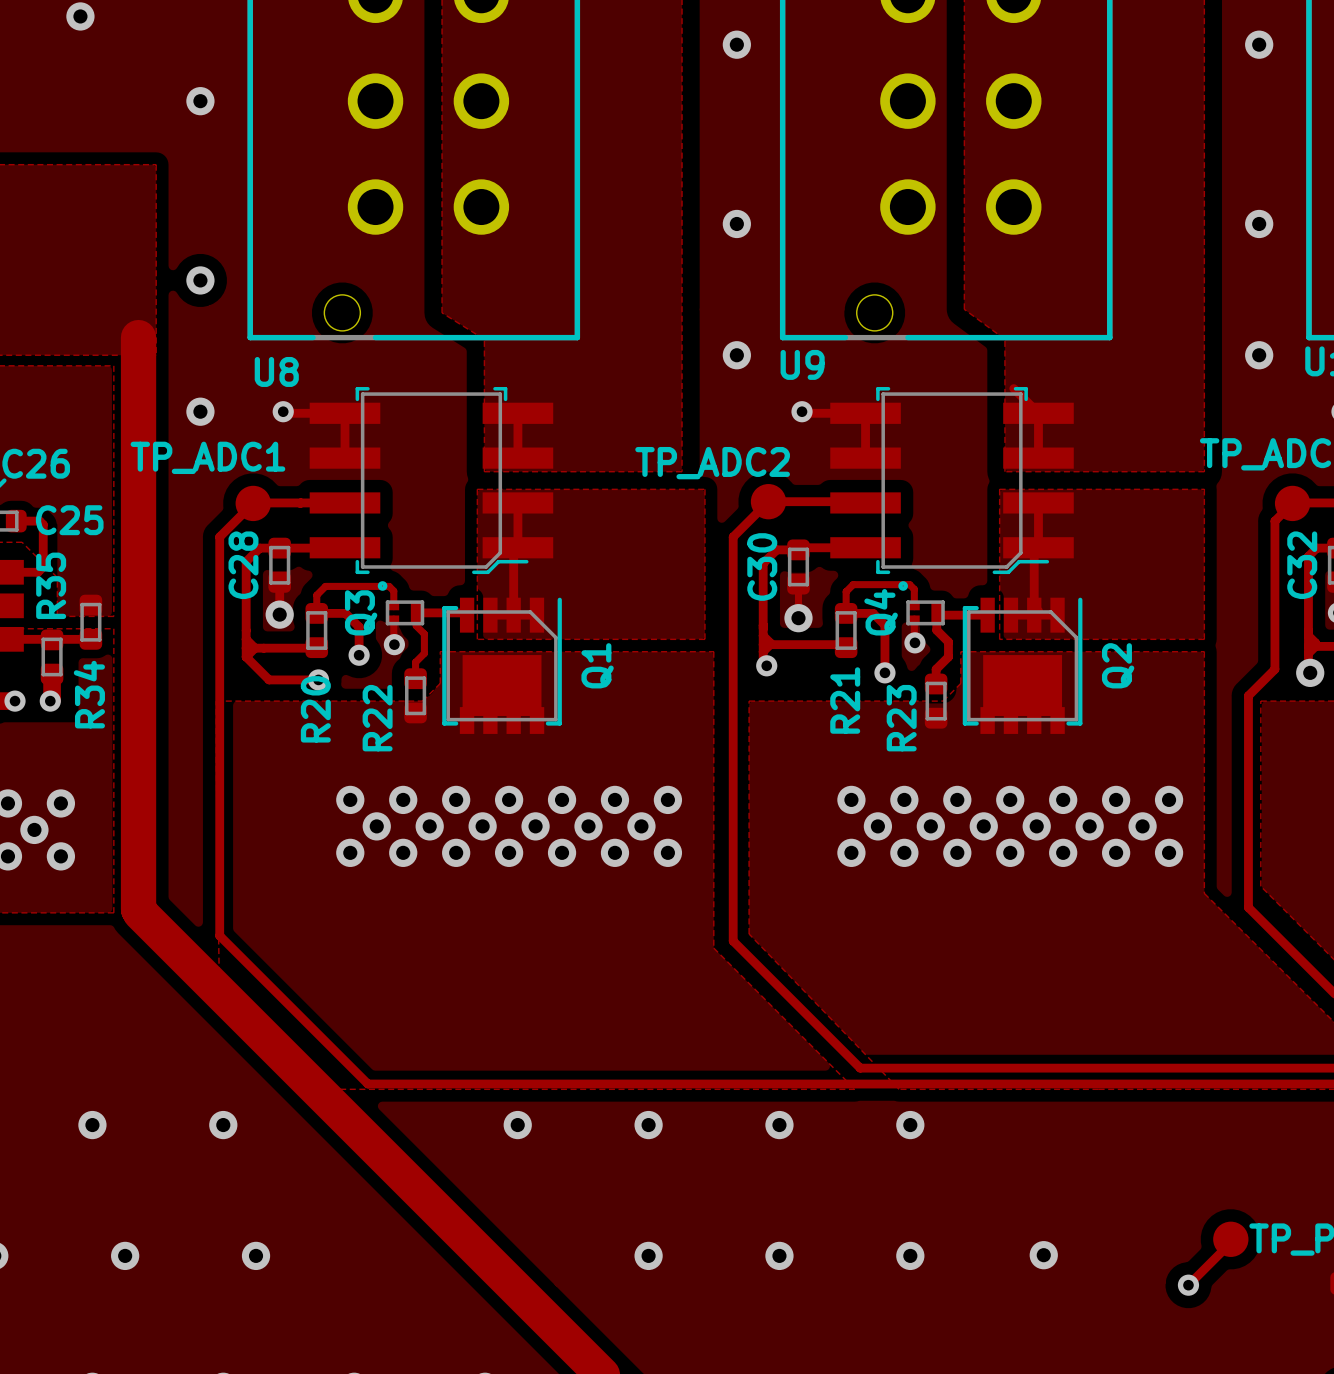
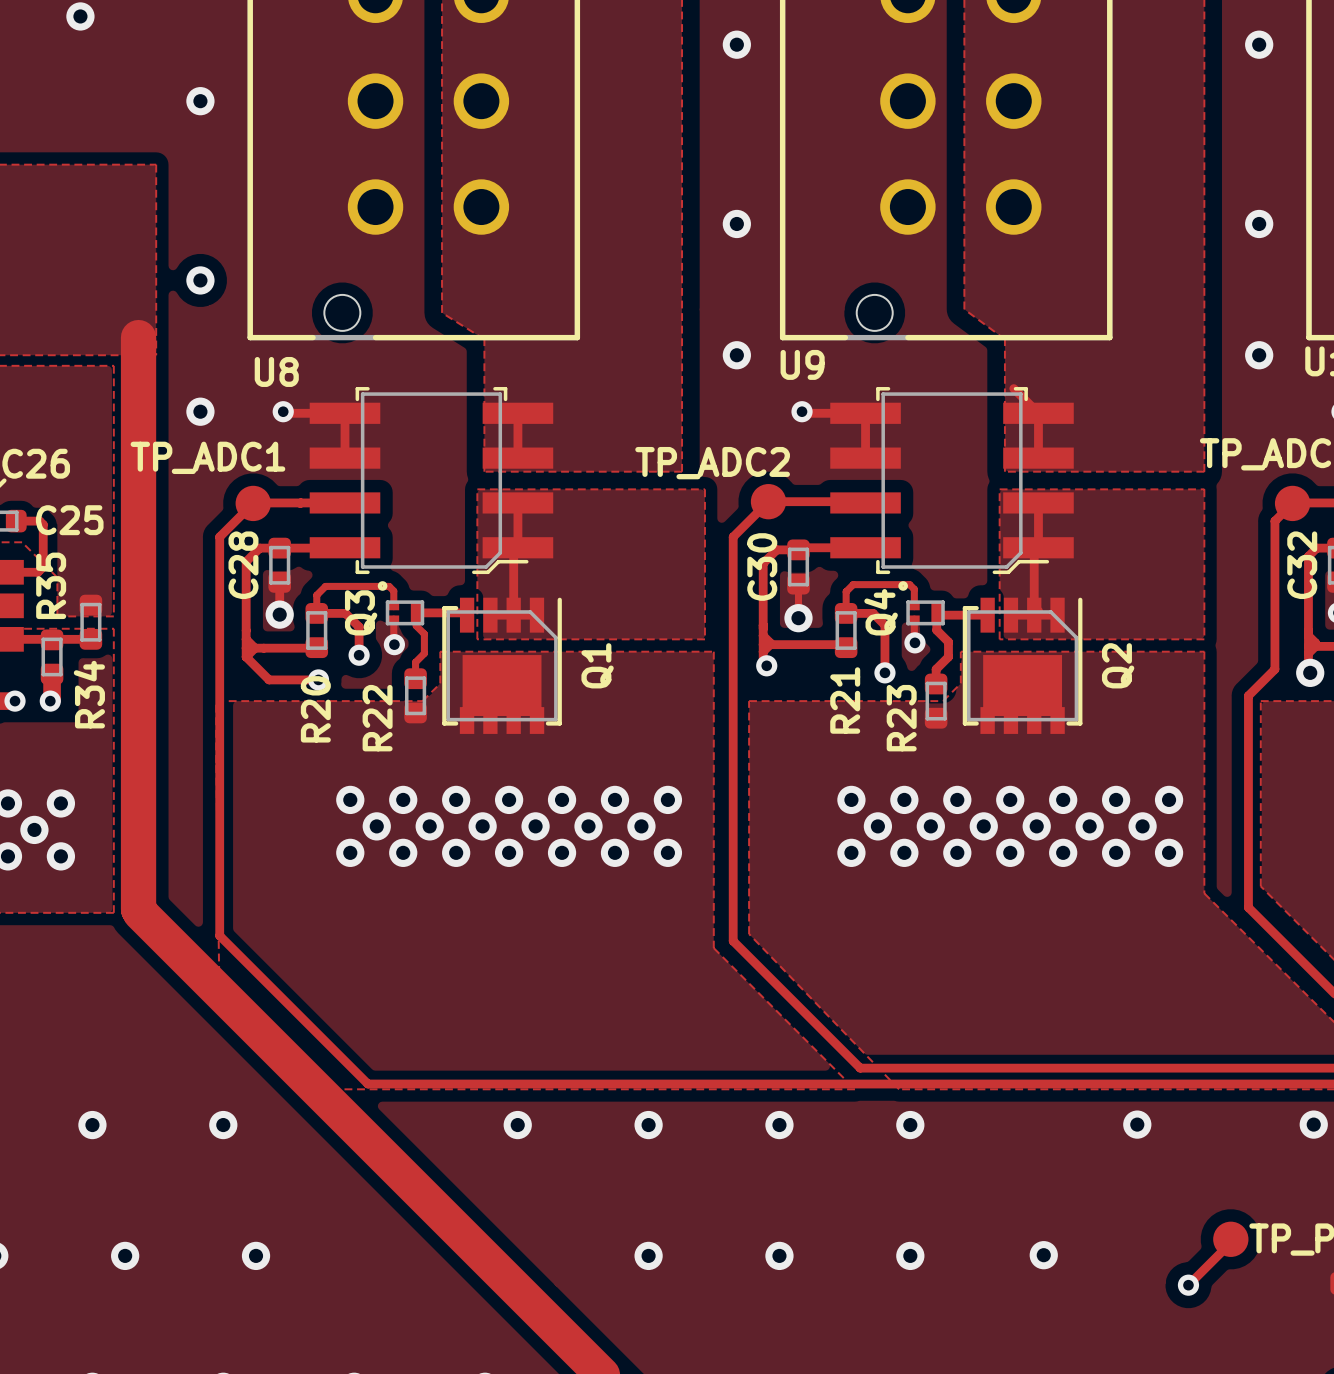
via: none -> (1137, 1124)
via: none -> (1313, 1124)

